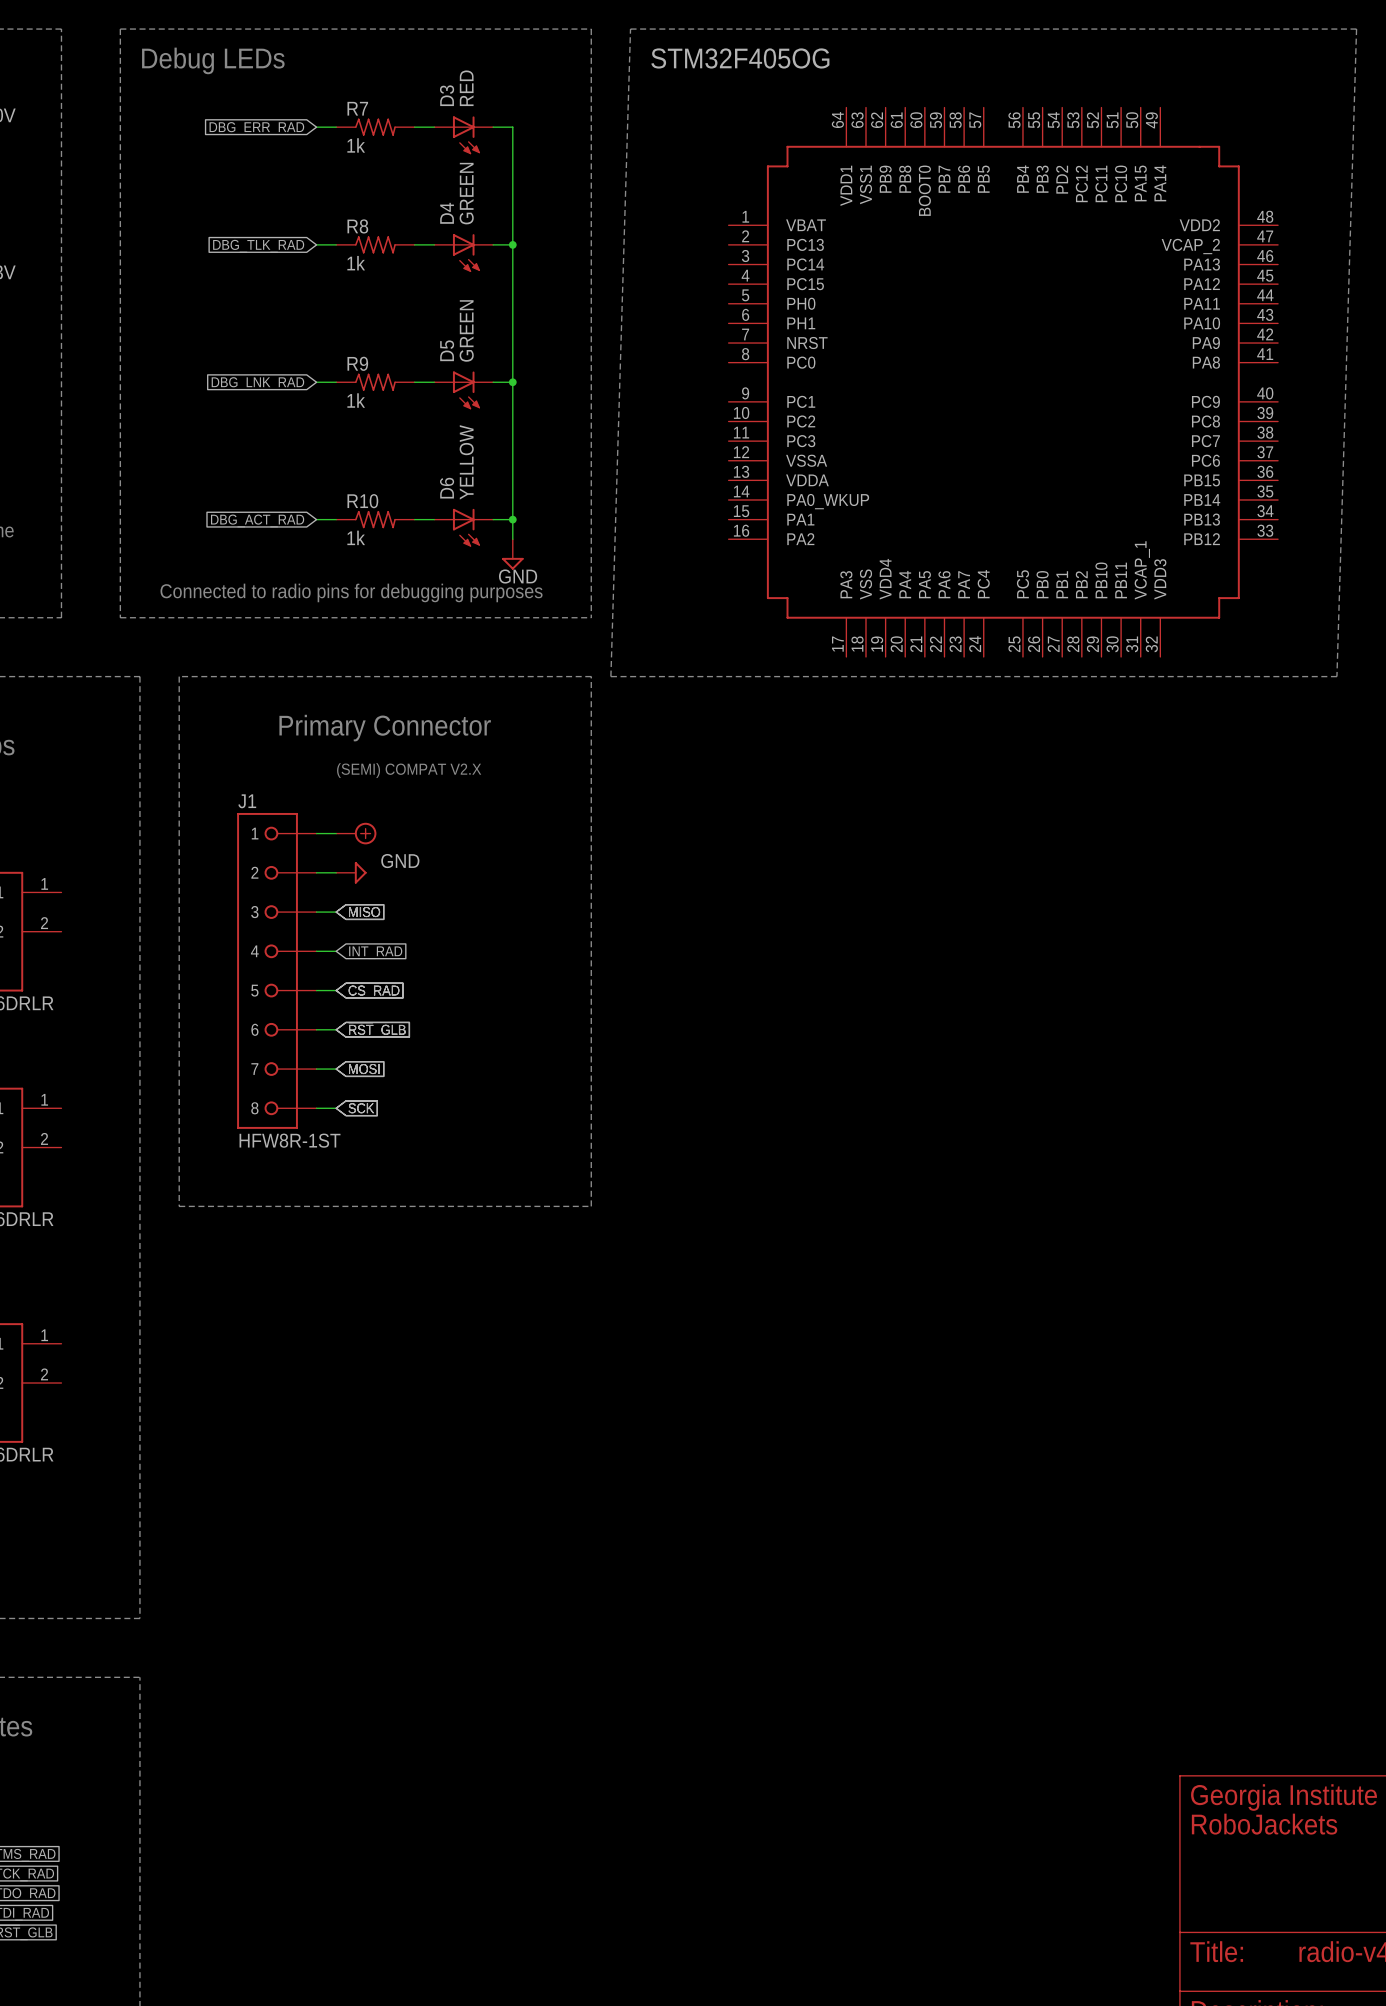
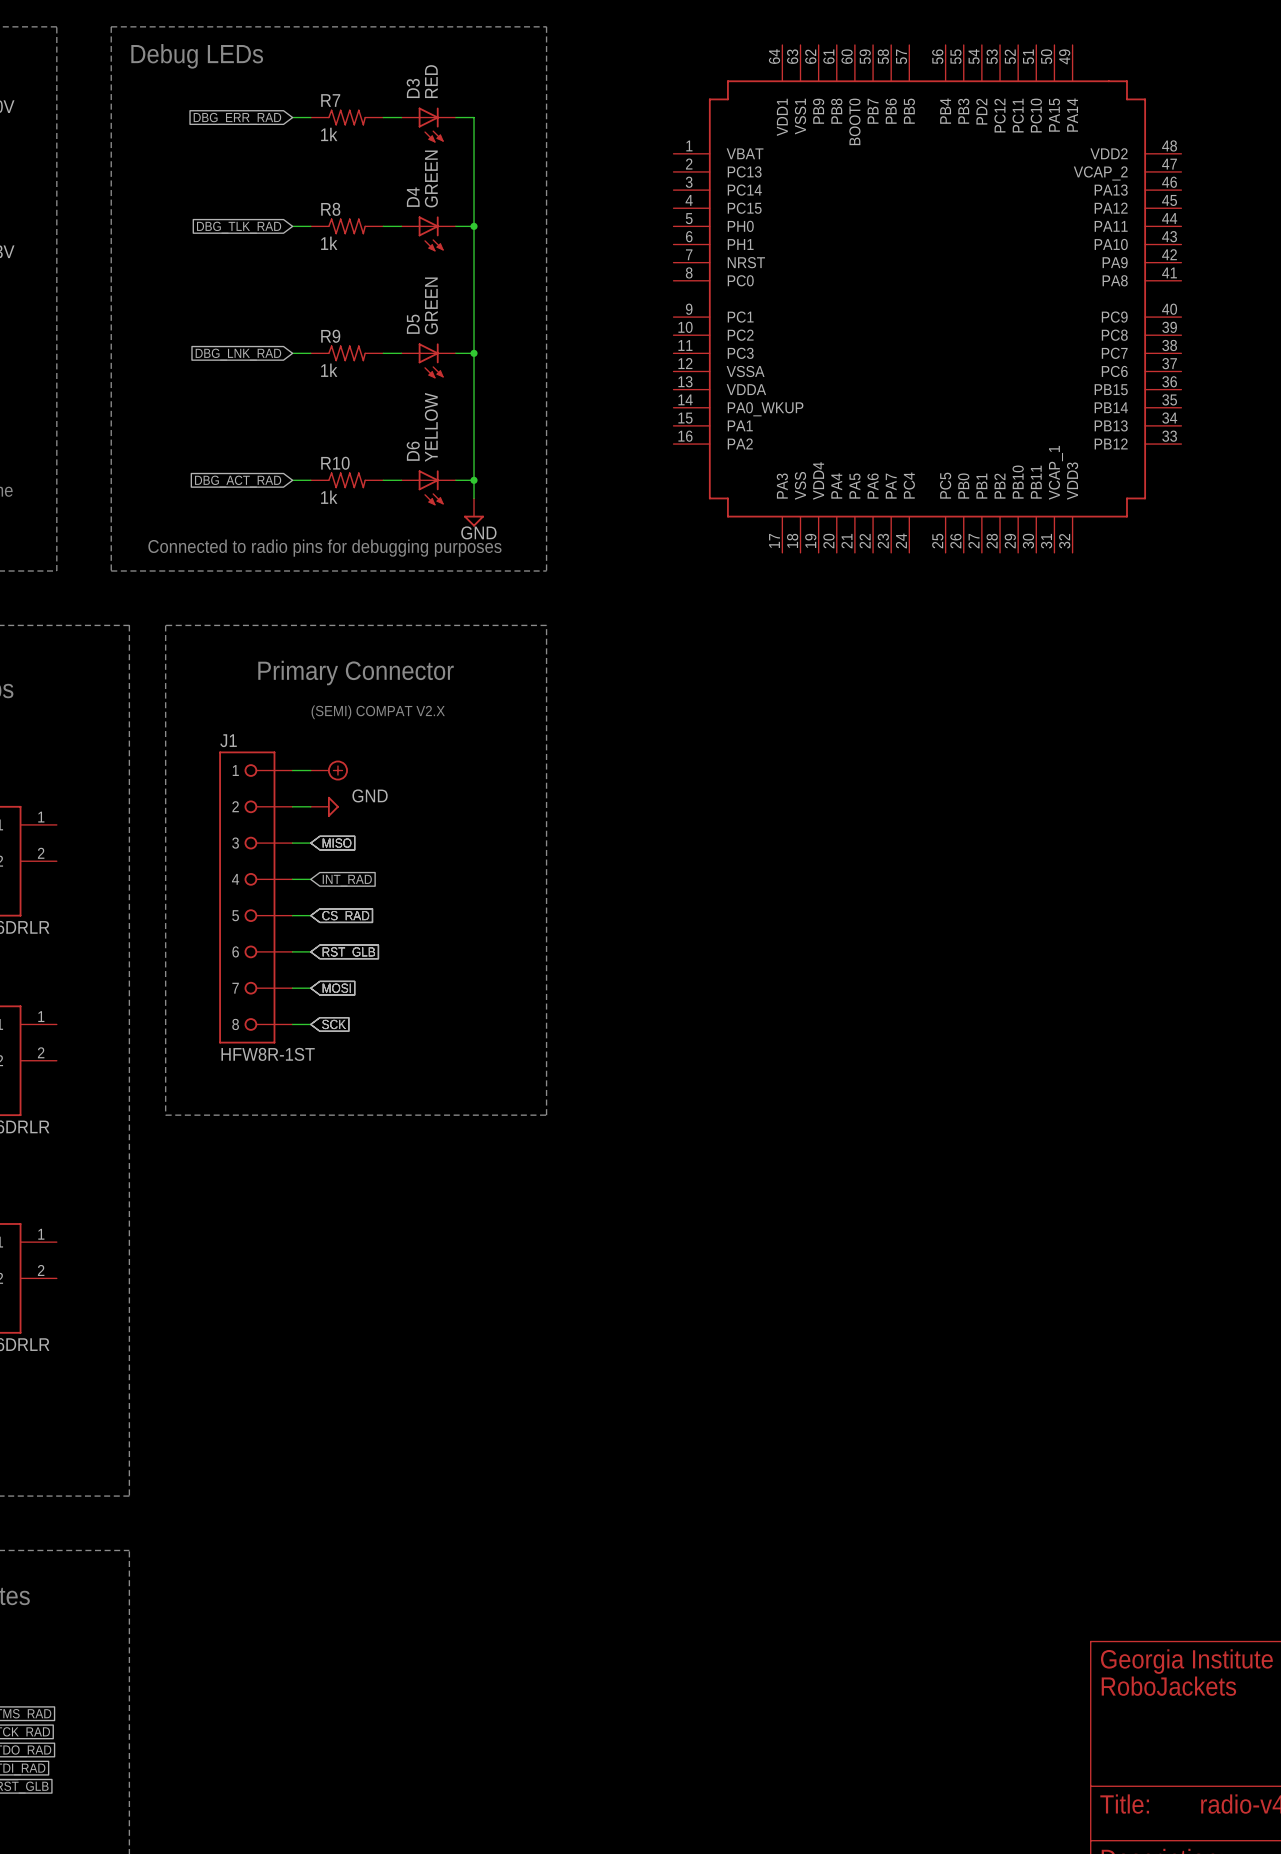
line: (630, 29) (1356, 29) (1336, 676) (610, 676) (630, 29) -> none
text: STM32F405OG (740, 58) -> none
part position: (1003, 382) -> (927, 298)

